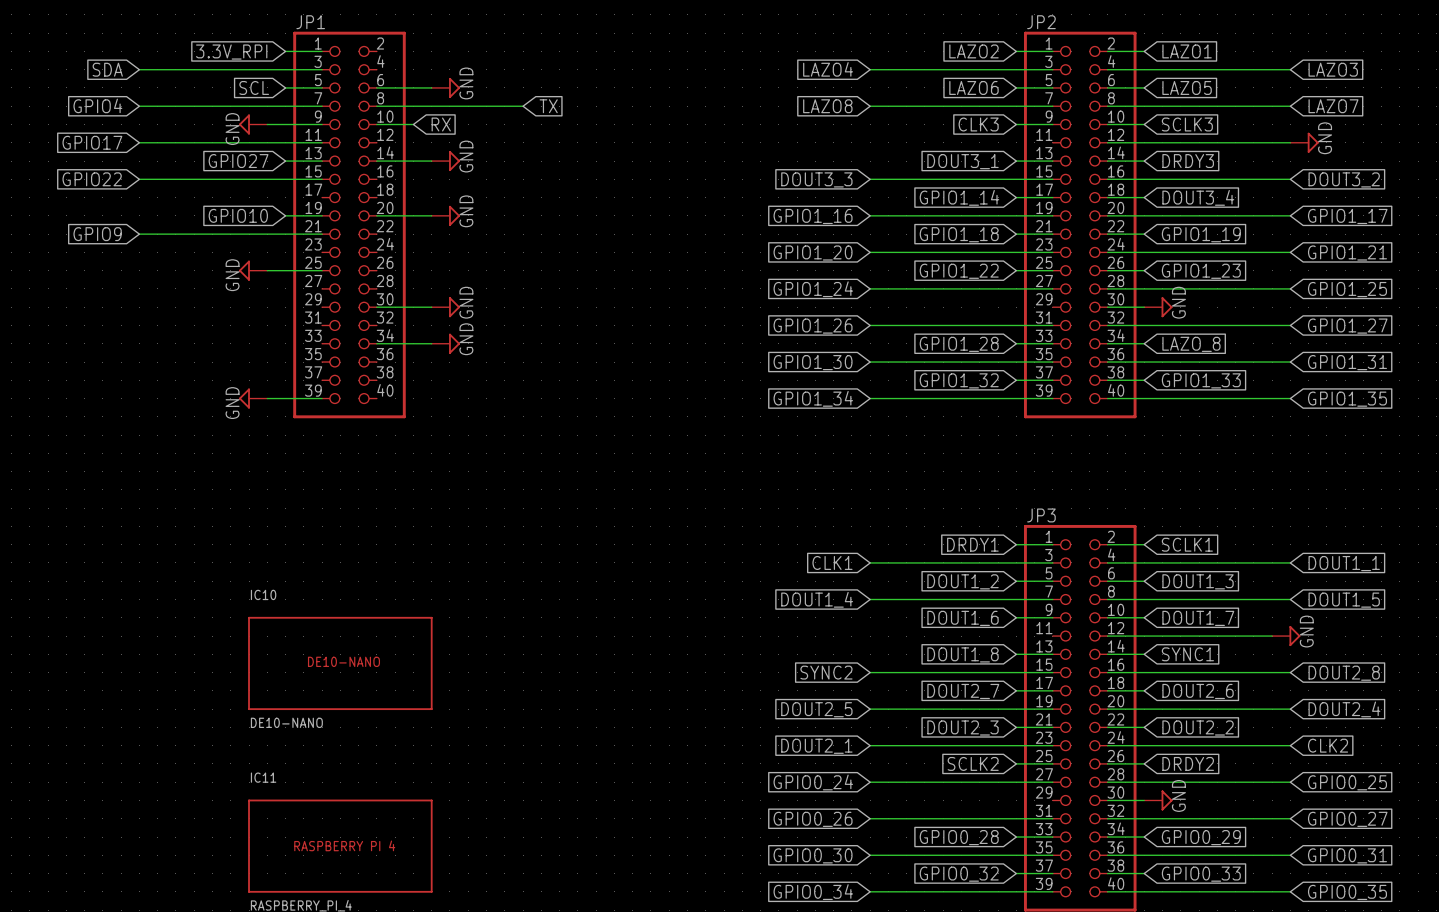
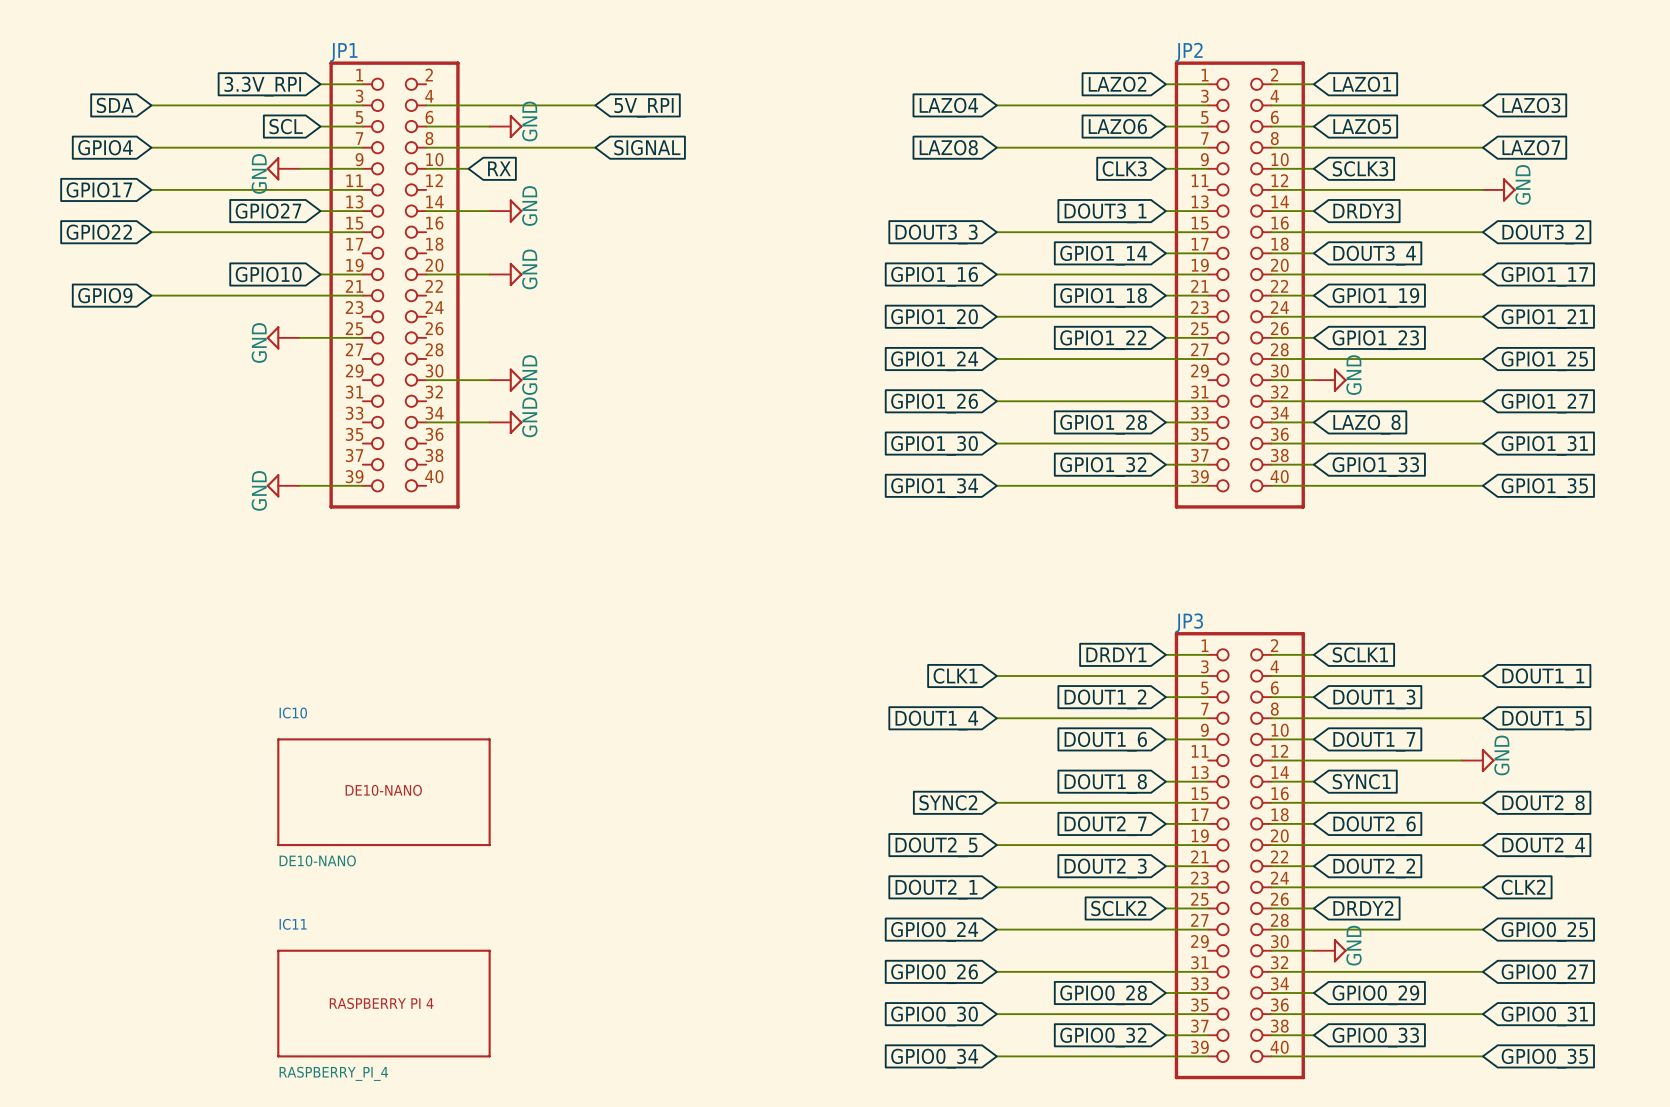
wire: none -> (426, 105) (595, 105)
global label: none -> 5V_RPI (644, 107)
global label: TX (548, 106) -> SIGNAL (647, 147)

